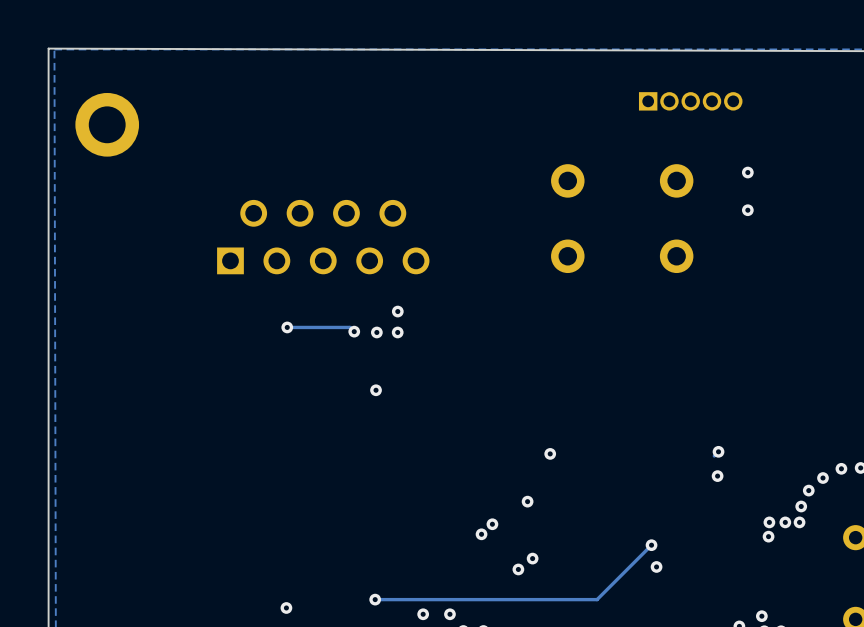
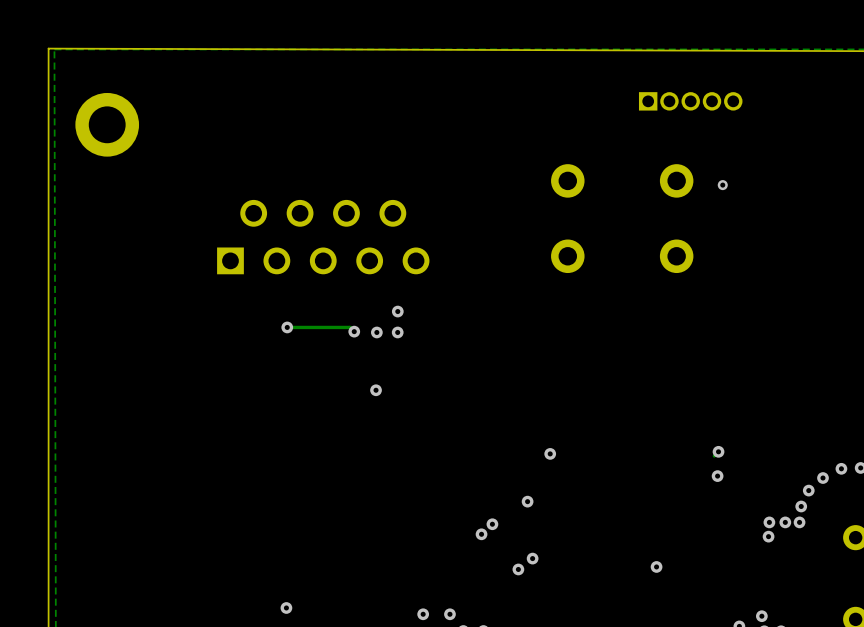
via: (747, 172) -> none
via: none -> (722, 185)
via: (747, 210) -> none
track: (651, 545) (597, 599) (375, 599) -> none
via: (651, 545) -> none
via: (375, 599) -> none

